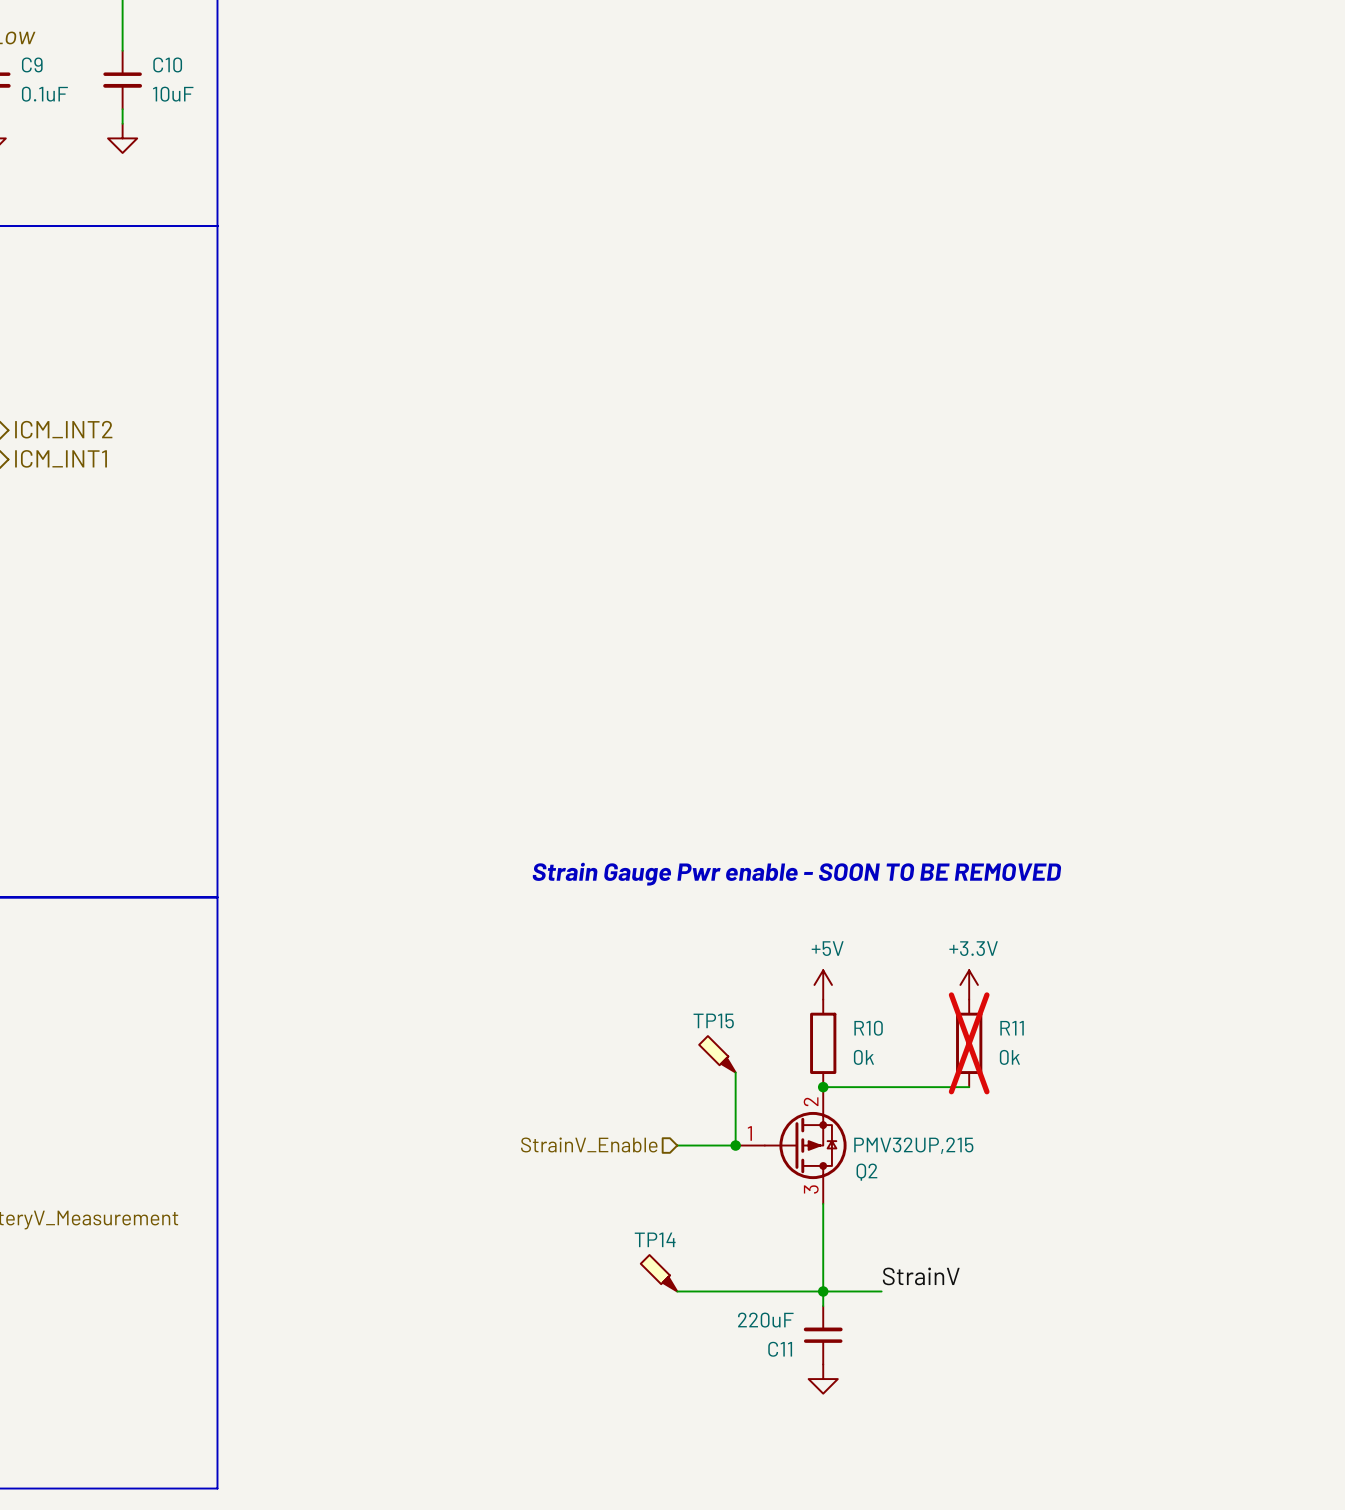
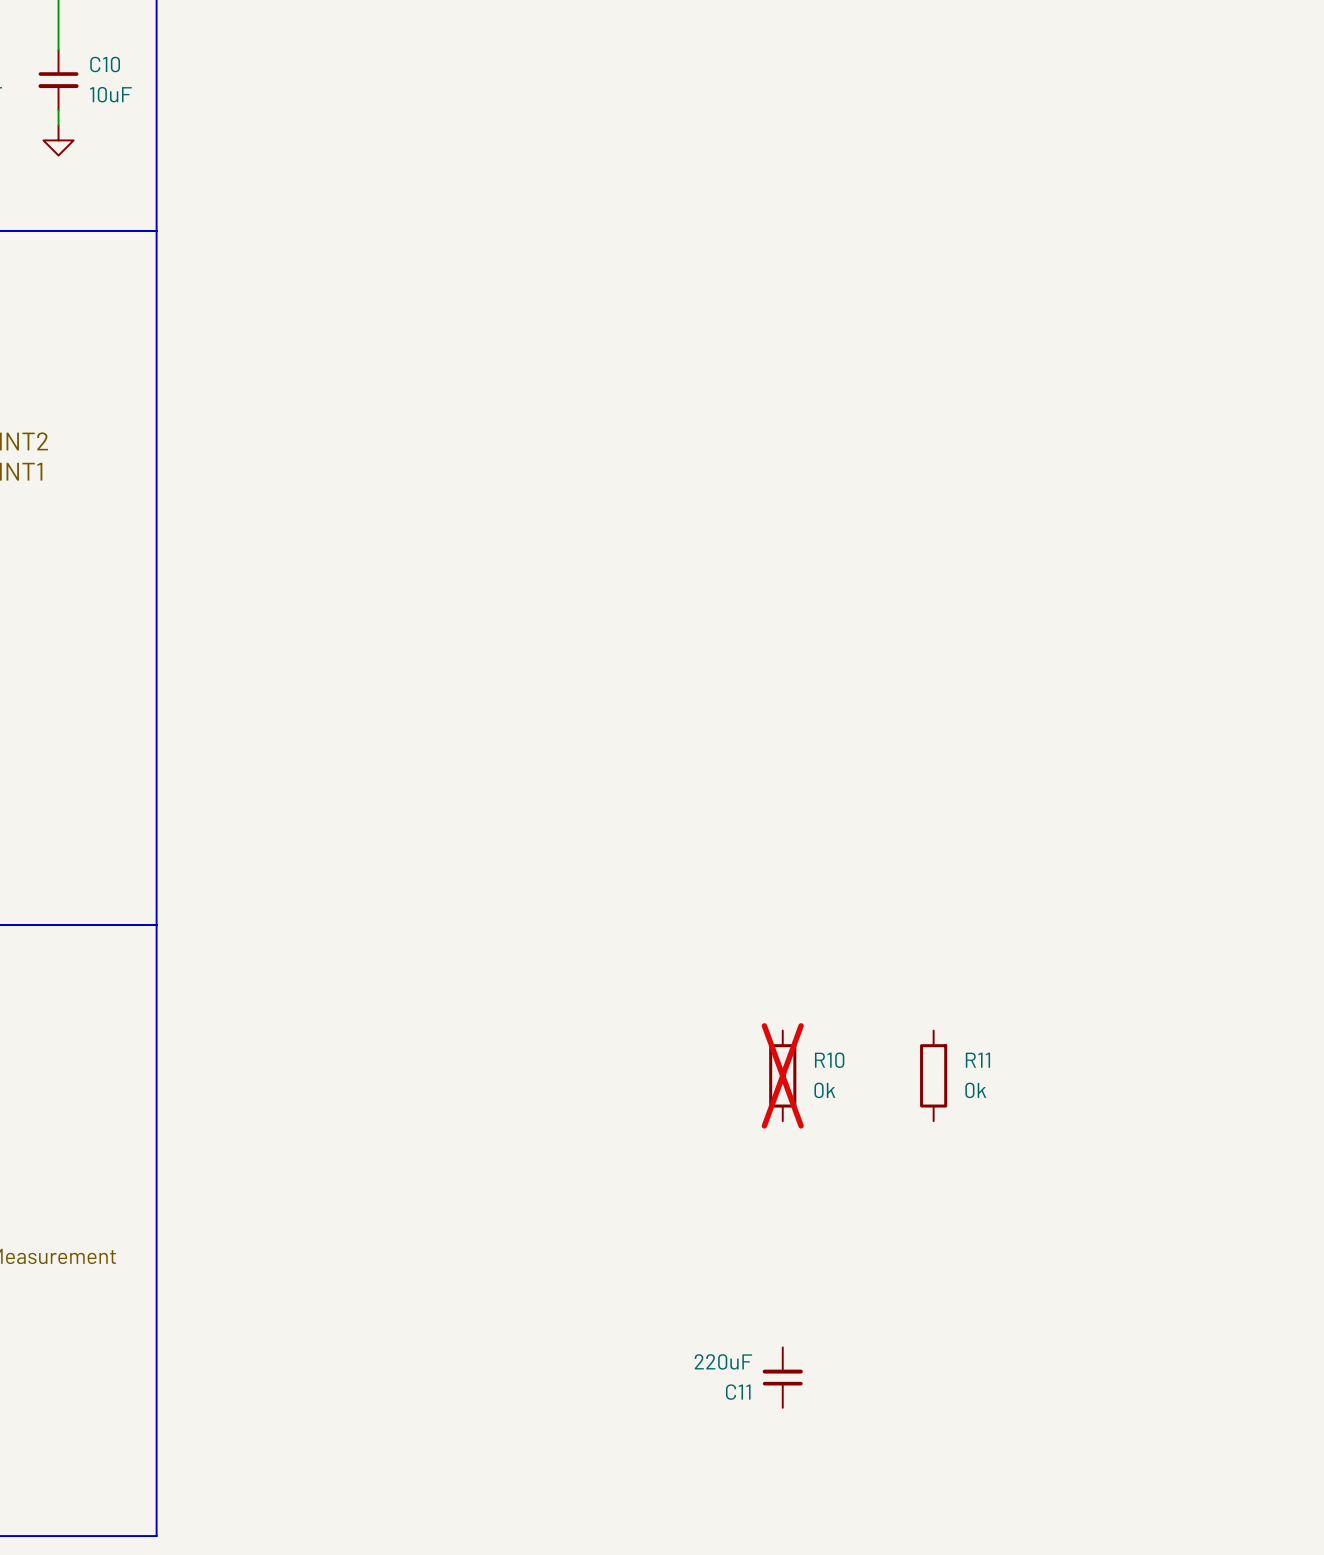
text: Strain Gauge Pwr enable - SOON TO BE REMOVED (796, 874) -> none
power symbol: +5V (823, 984) -> none
power symbol: +3.3V (969, 984) -> none
R10 do-not-place cross: none -> (782, 1075)
R11 do-not-place cross: (969, 1043) -> none
TP15: (717, 1054) -> none
wire: (735, 1072) (735, 1145) (677, 1145) -> none
wire: (823, 1087) (969, 1087) -> none
junction: (823, 1087) -> none
hierarchical label: StrainV_Enable (589, 1144) -> none
junction: (735, 1145) -> none
Q2: PMV32UP,215 (791, 1145) -> none
wire: (823, 1203) (823, 1306) -> none
TP14: (659, 1273) -> none
label: StrainV (921, 1276) -> none
wire: (677, 1291) (881, 1291) -> none
junction: (823, 1291) -> none
power symbol: (823, 1379) -> none

